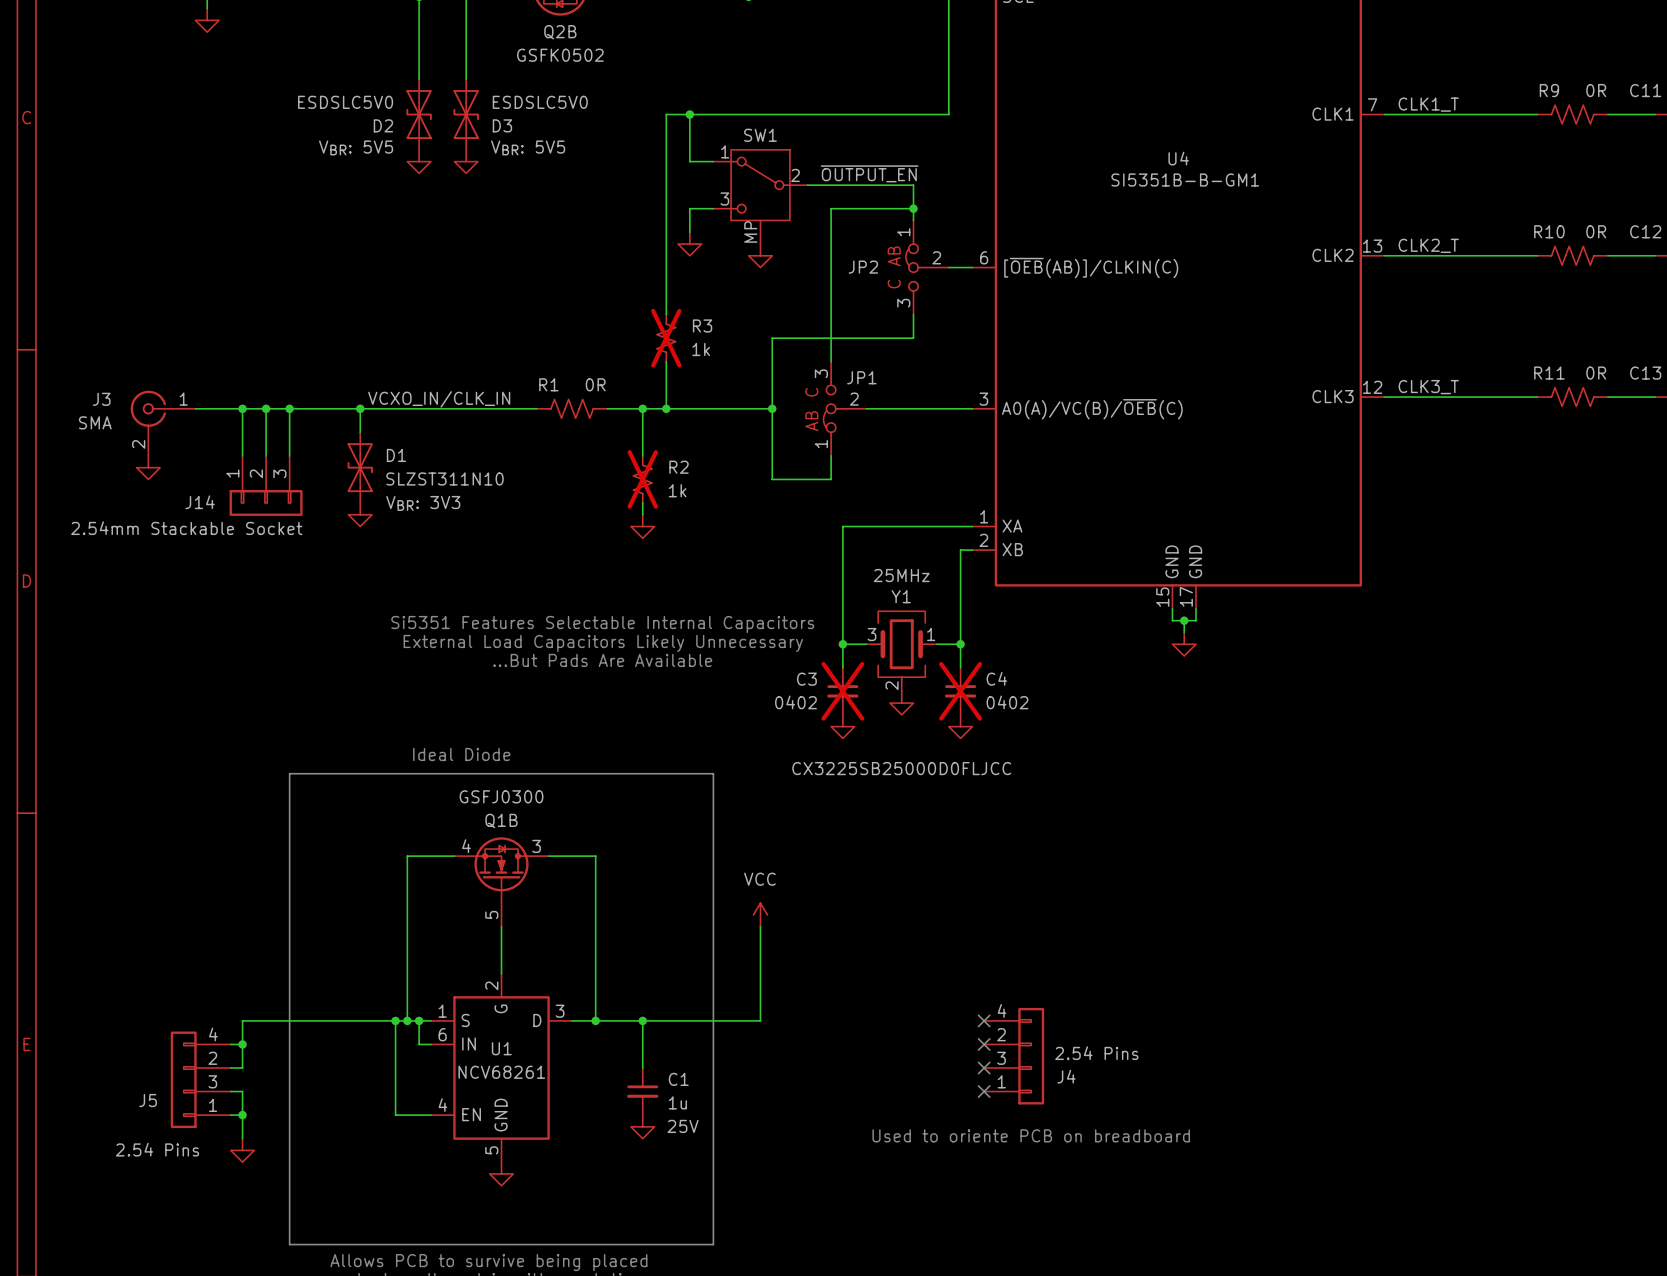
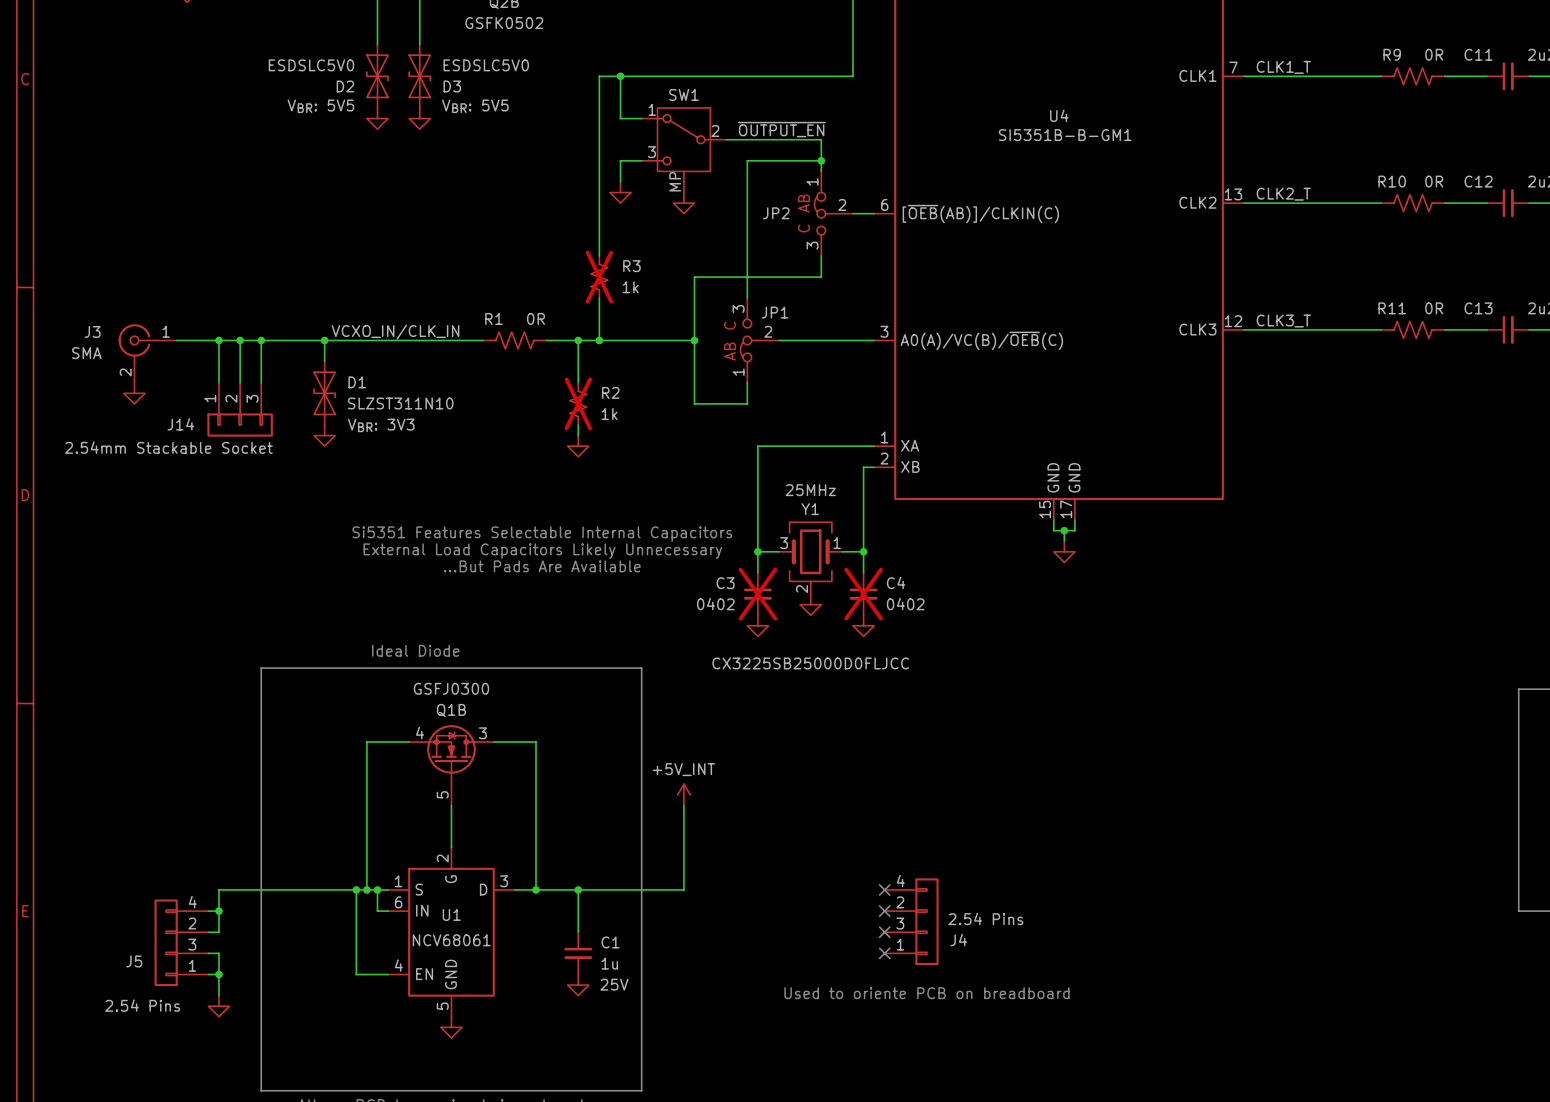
power symbol: VCC (760, 914) -> +5V_INT (683, 794)
U1 value: NCV68261 (501, 1072) -> NCV68061 (451, 940)

